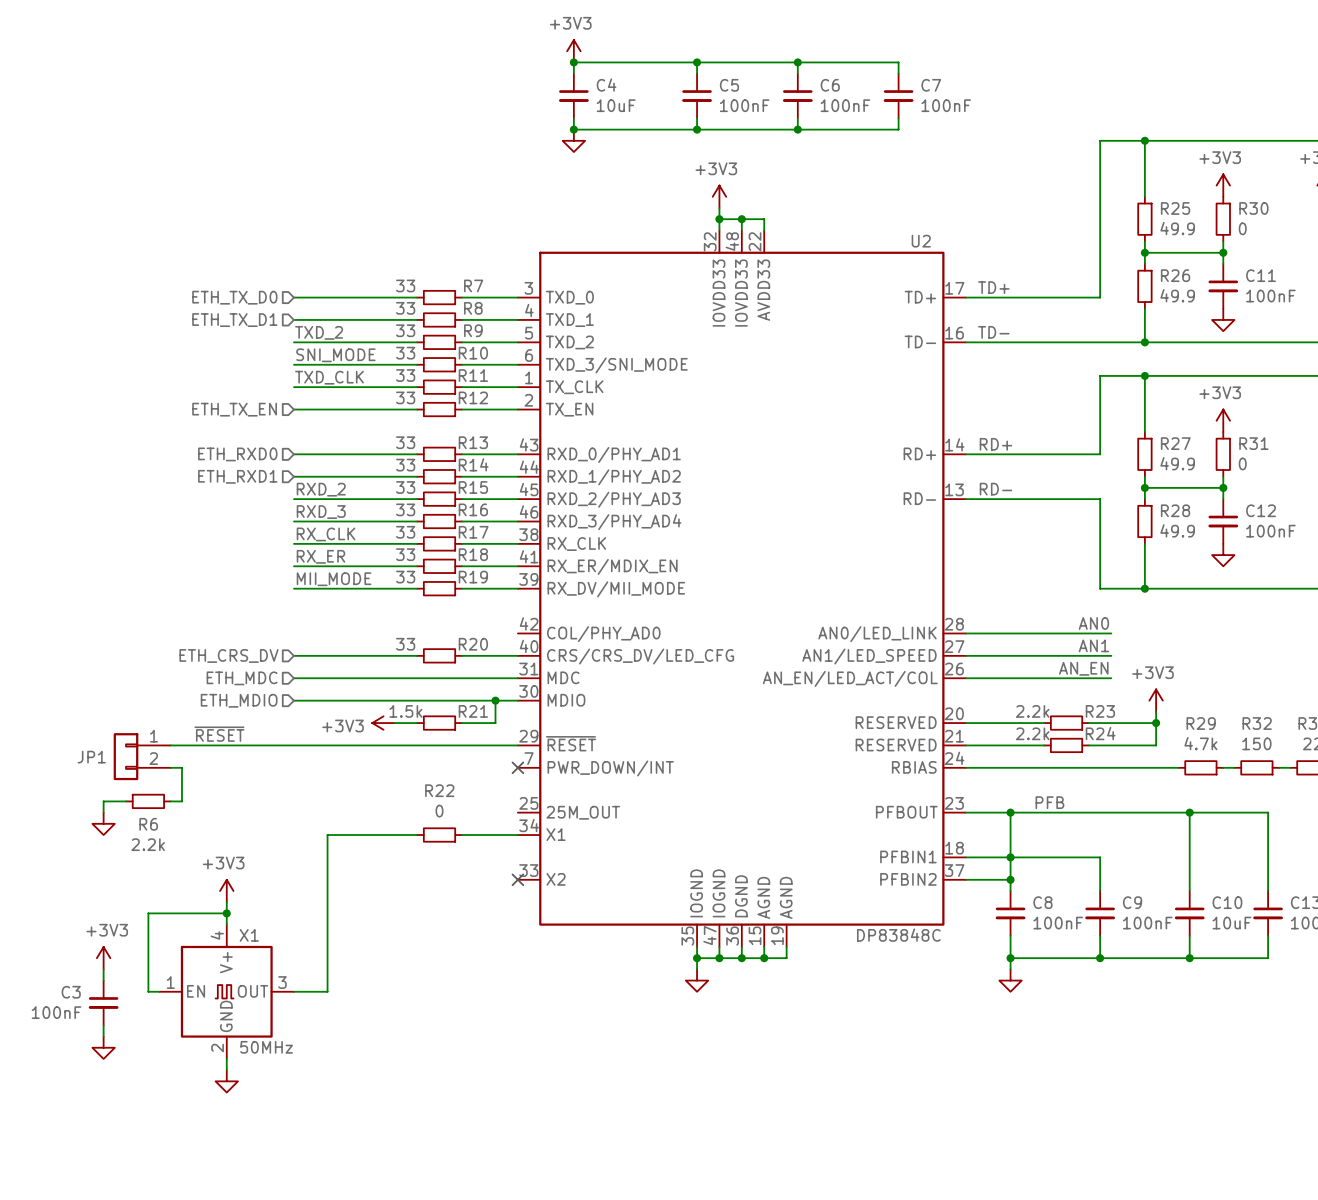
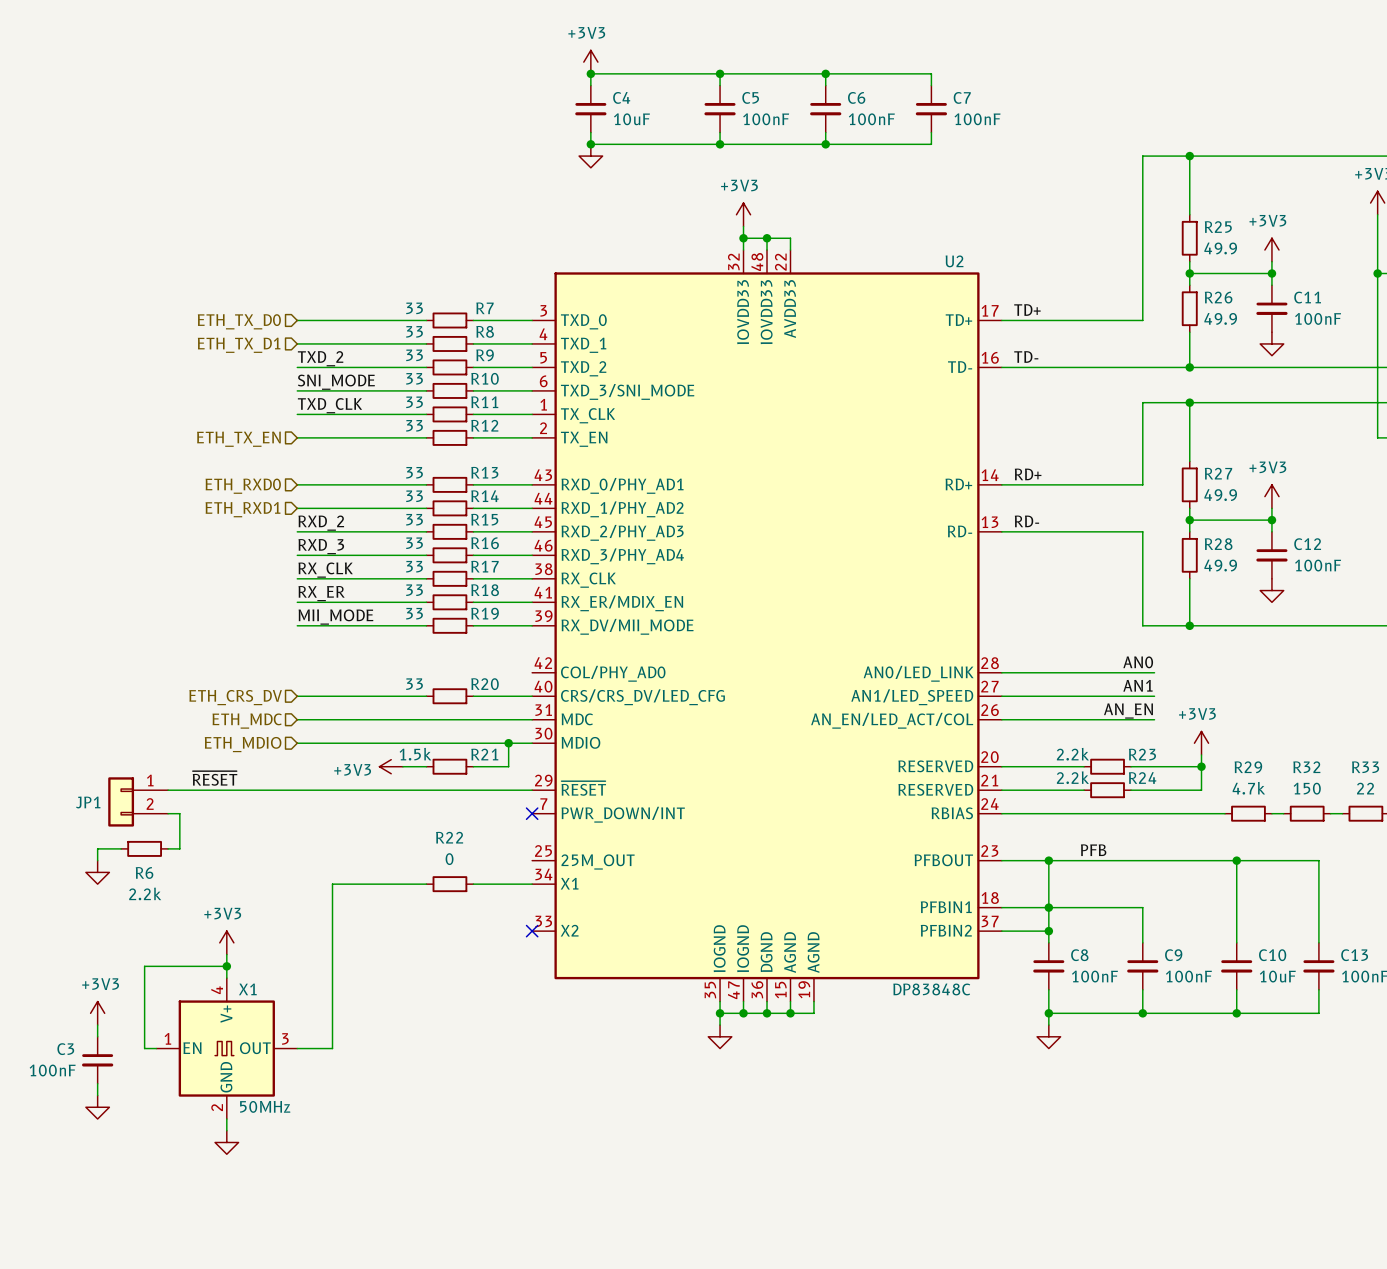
power symbol position: +3V3 (1223, 185) -> +3V3 (1271, 250)
R30: 0 (1223, 219) -> none
power symbol position: +3V3 (1223, 420) -> +3V3 (1271, 496)
R31: 0 (1223, 454) -> none

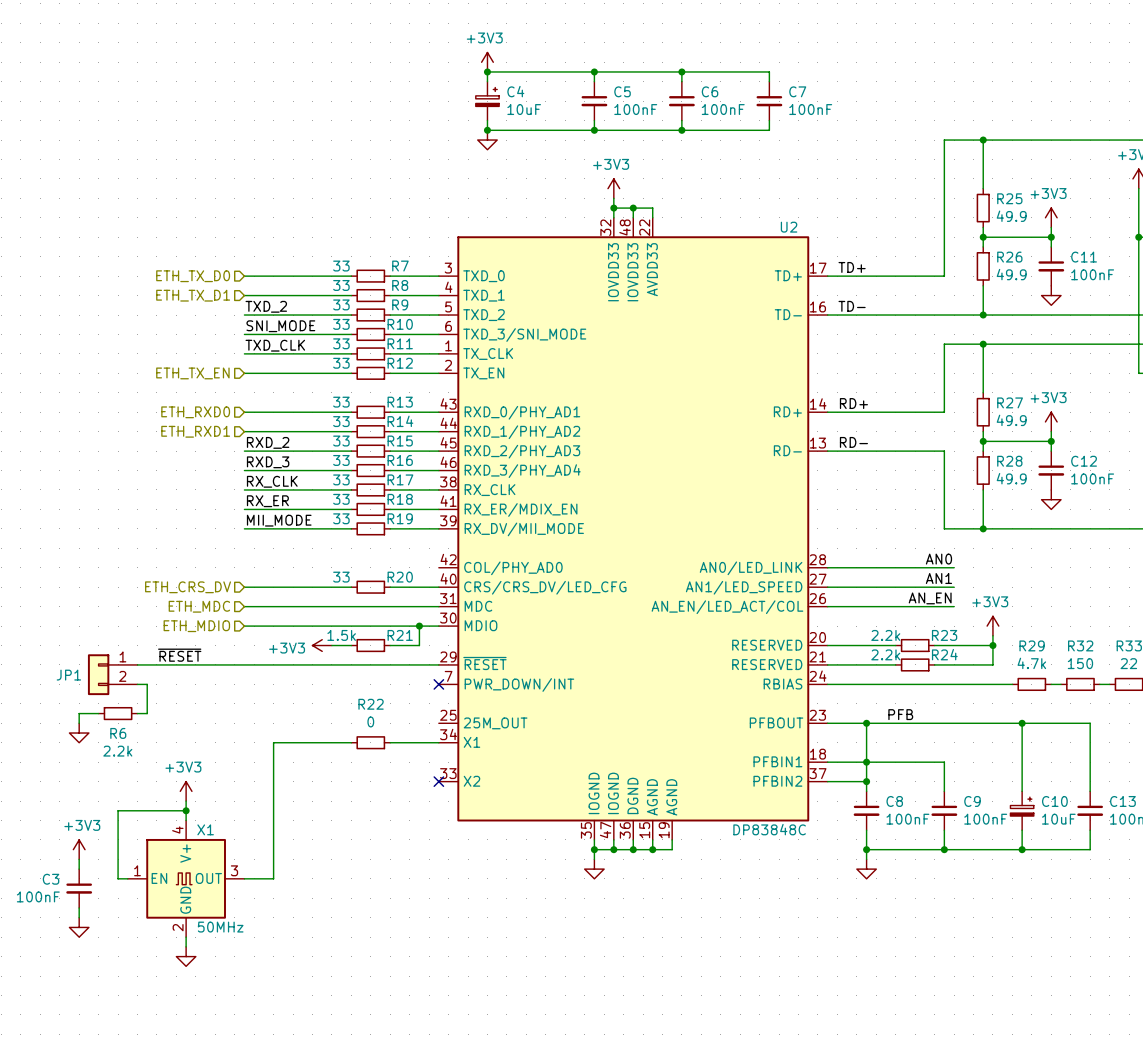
C4 symbol: [575, 85, 607, 133] -> [475, 81, 500, 121]
C10 symbol: [1221, 942, 1253, 990] -> [1010, 791, 1034, 831]

